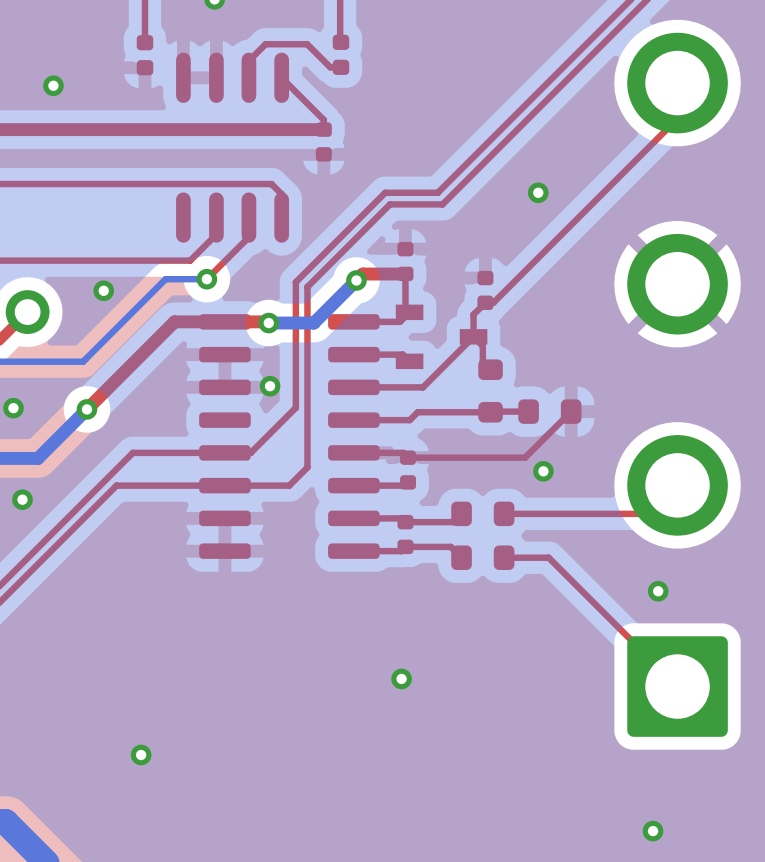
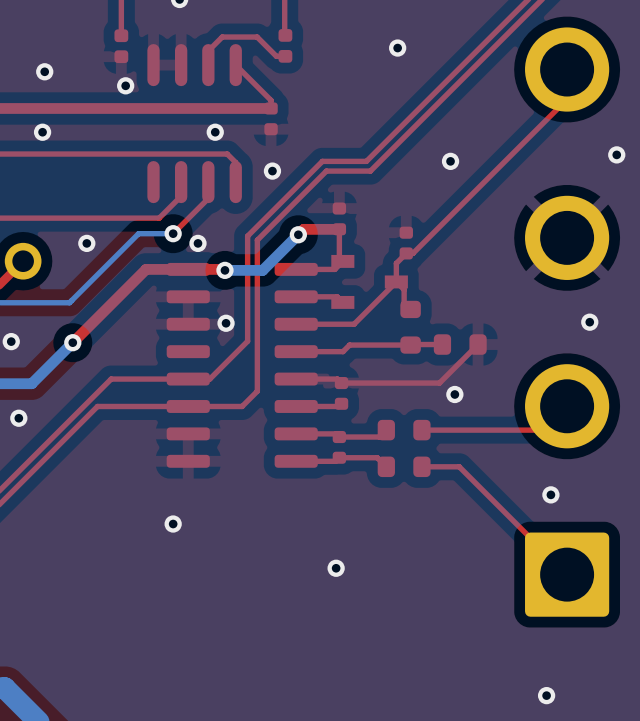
via: none -> (397, 48)
via: none -> (125, 85)
via: none -> (42, 132)
via: none -> (215, 132)
via: none -> (616, 154)
via: none -> (272, 171)
via: none -> (197, 243)
via: none -> (589, 322)
via position: (141, 755) -> (173, 524)

